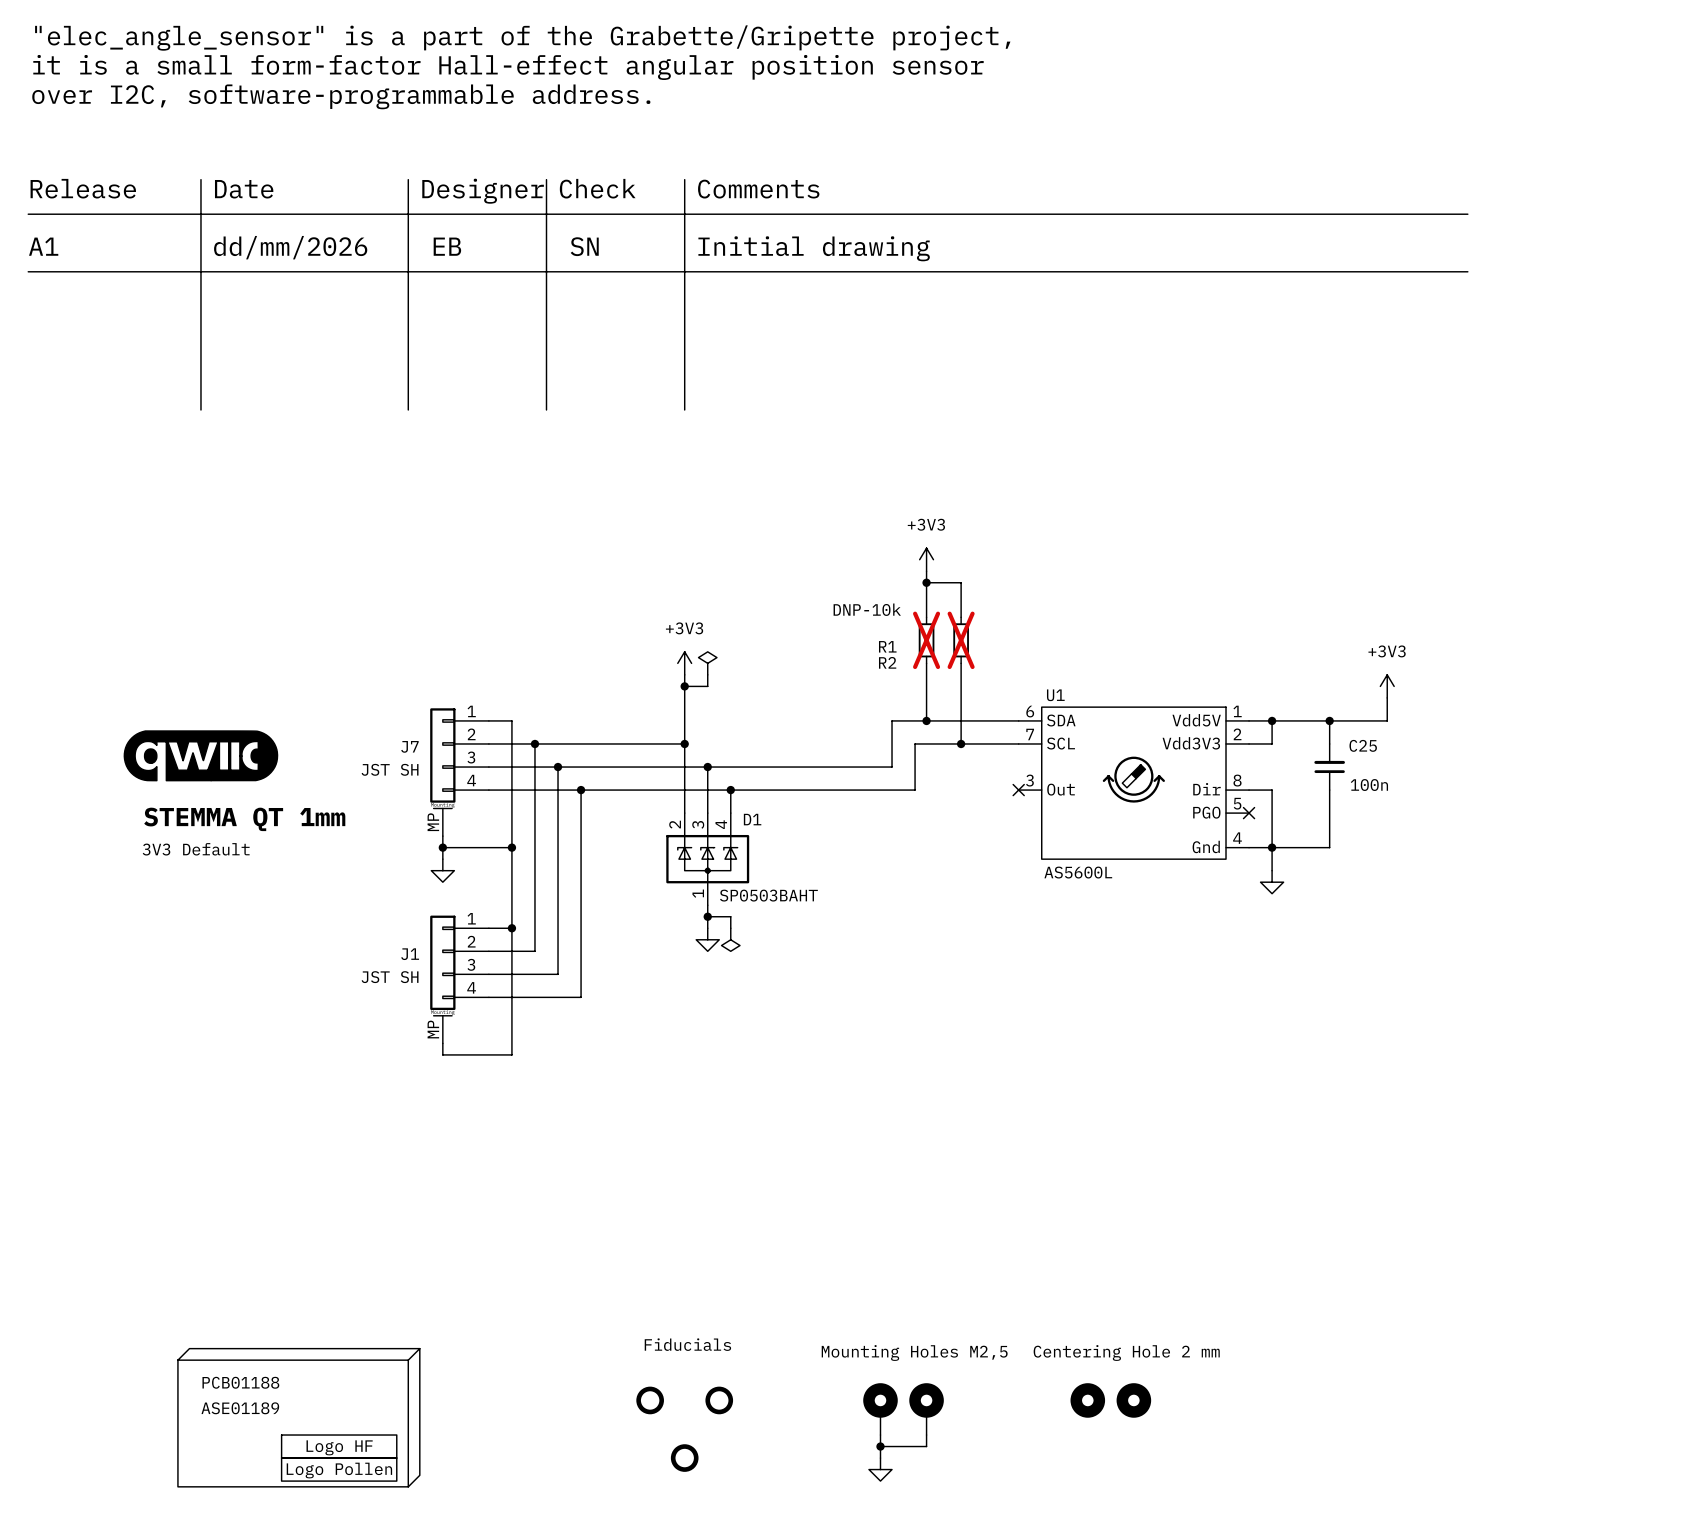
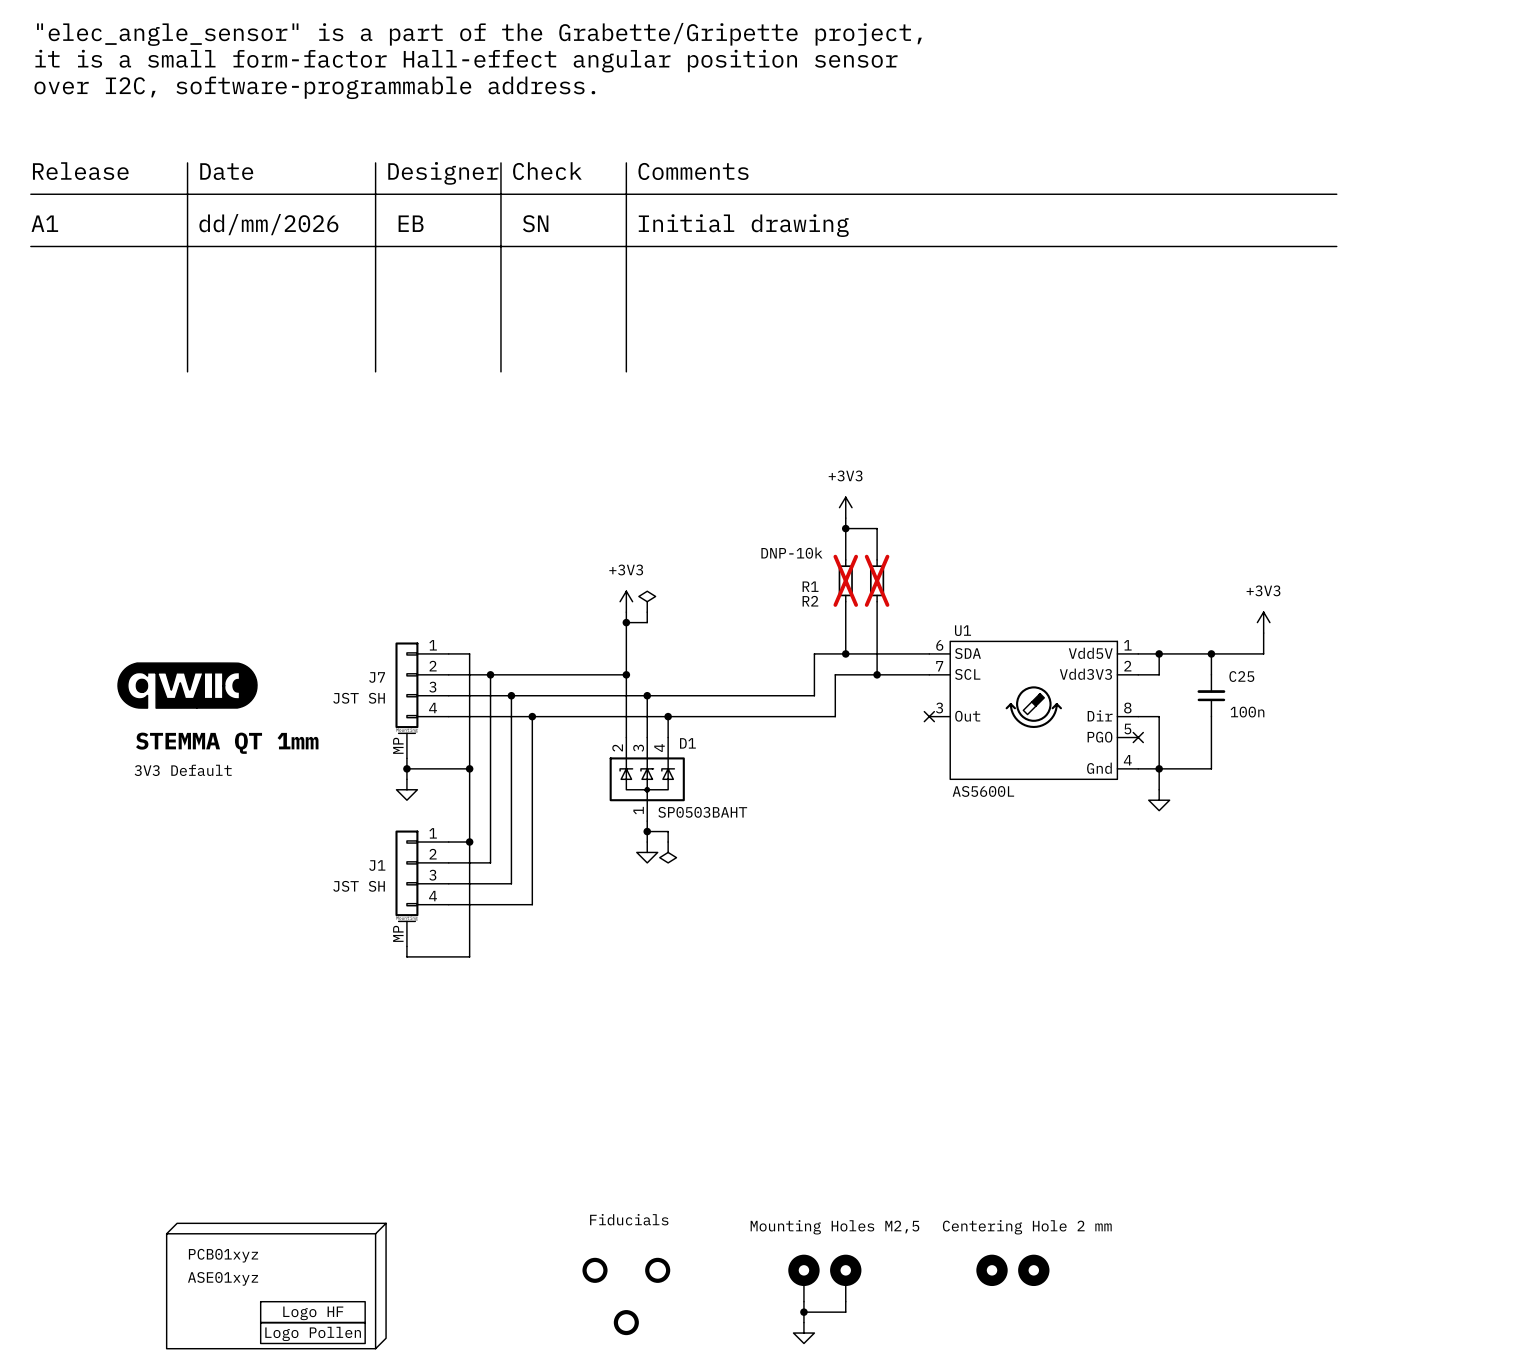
part value: PCB01188 (240, 1382) -> PCB01xyz (223, 1255)
text: ASE01189 (240, 1408) -> ASE01xyz (223, 1278)

